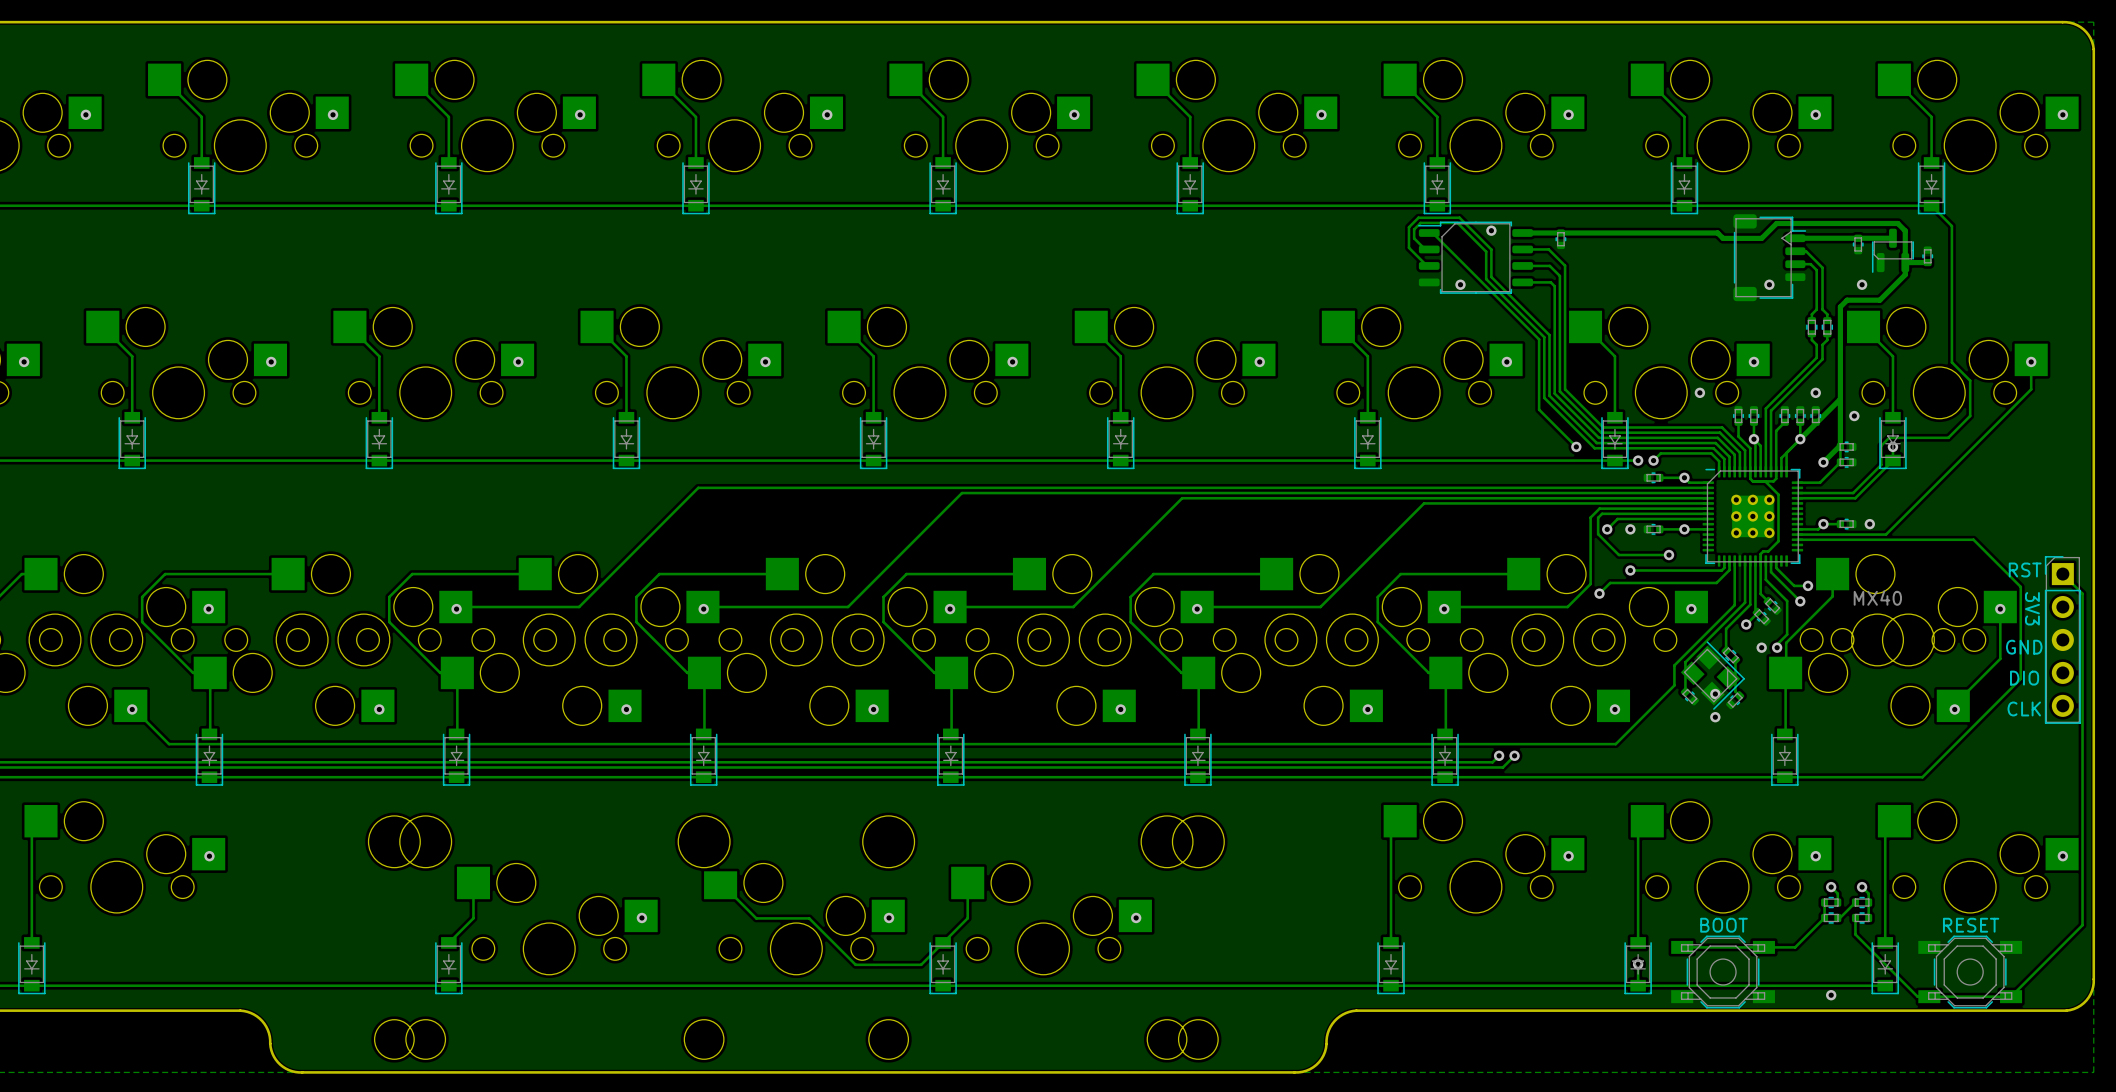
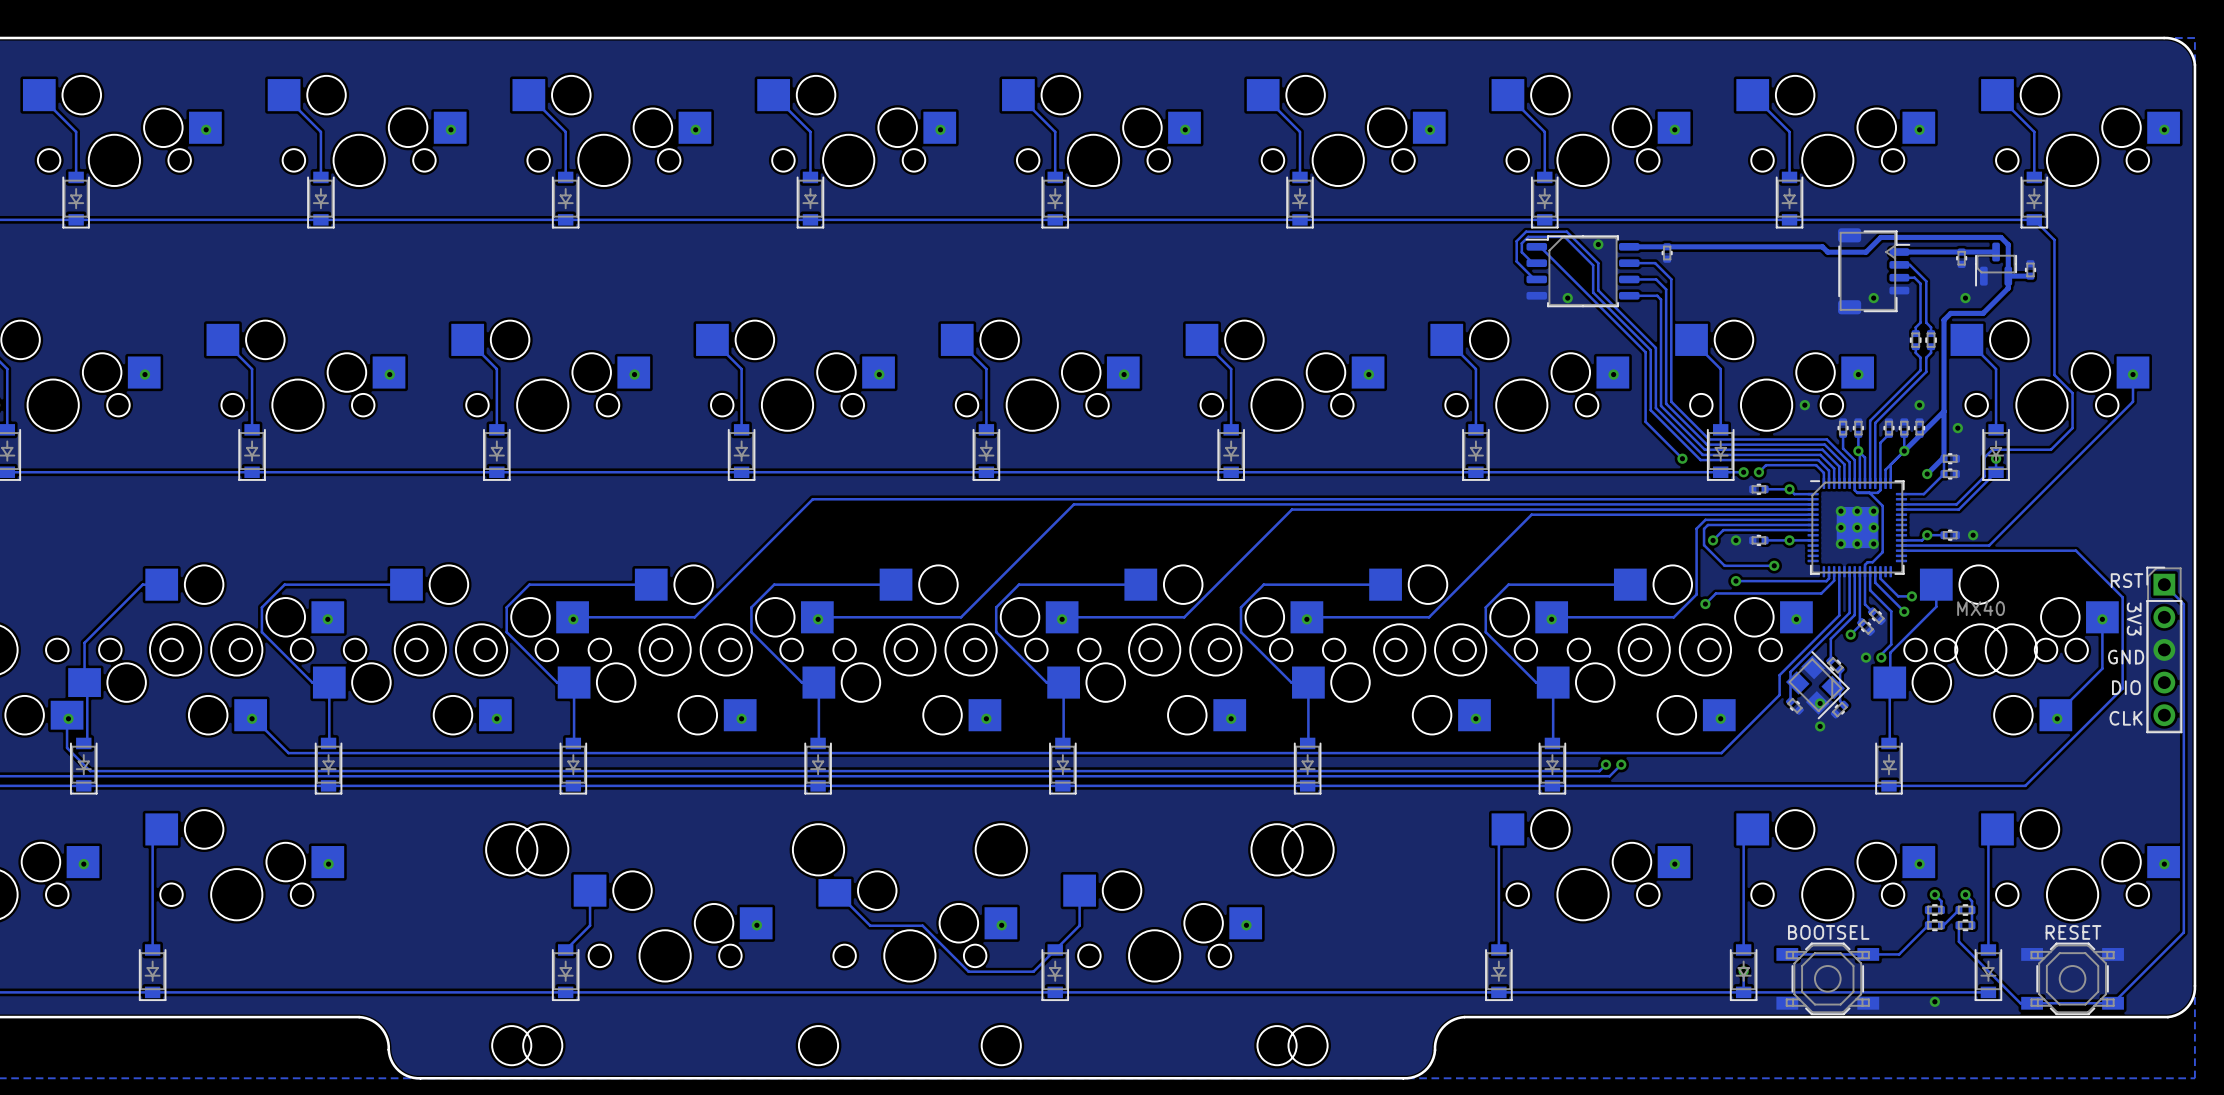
part value: BOOT (1724, 925) -> BOOTSEL (1828, 932)

